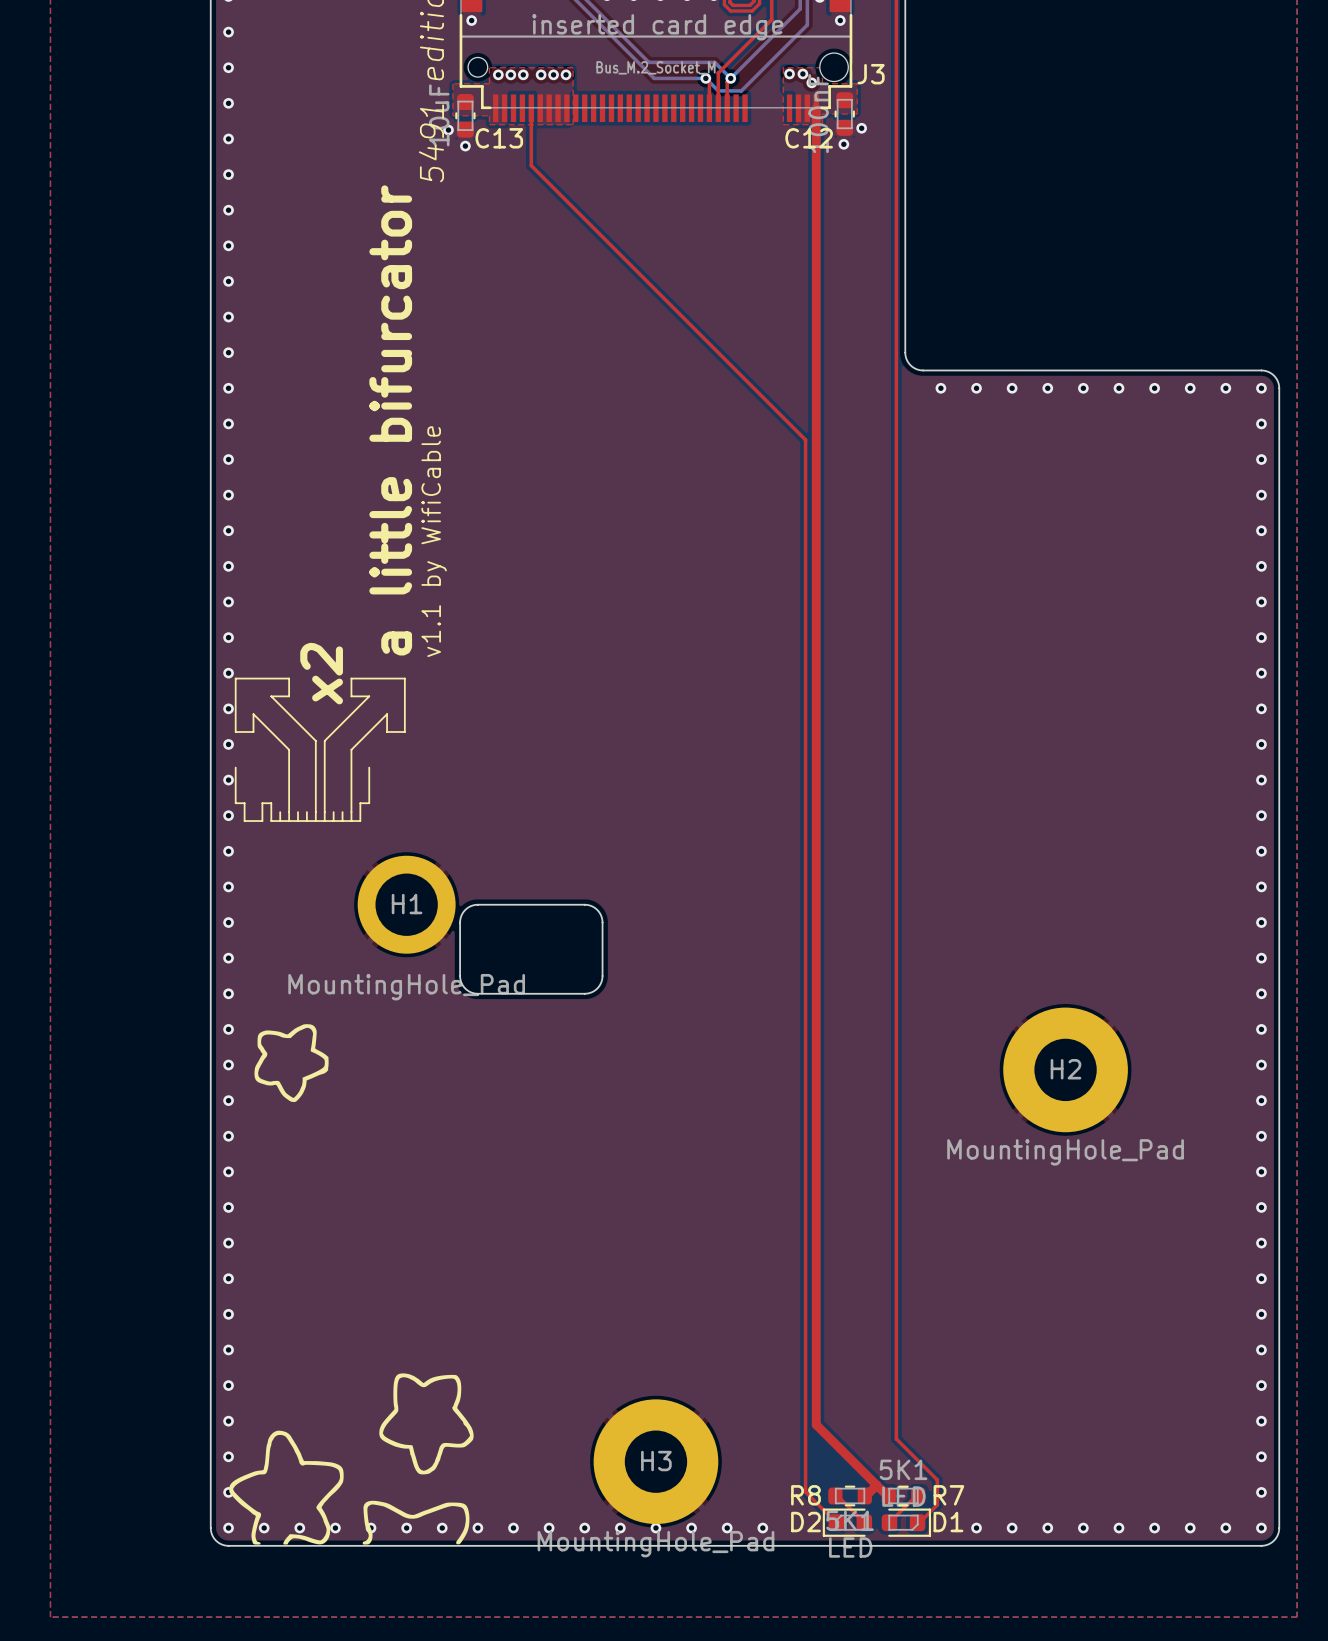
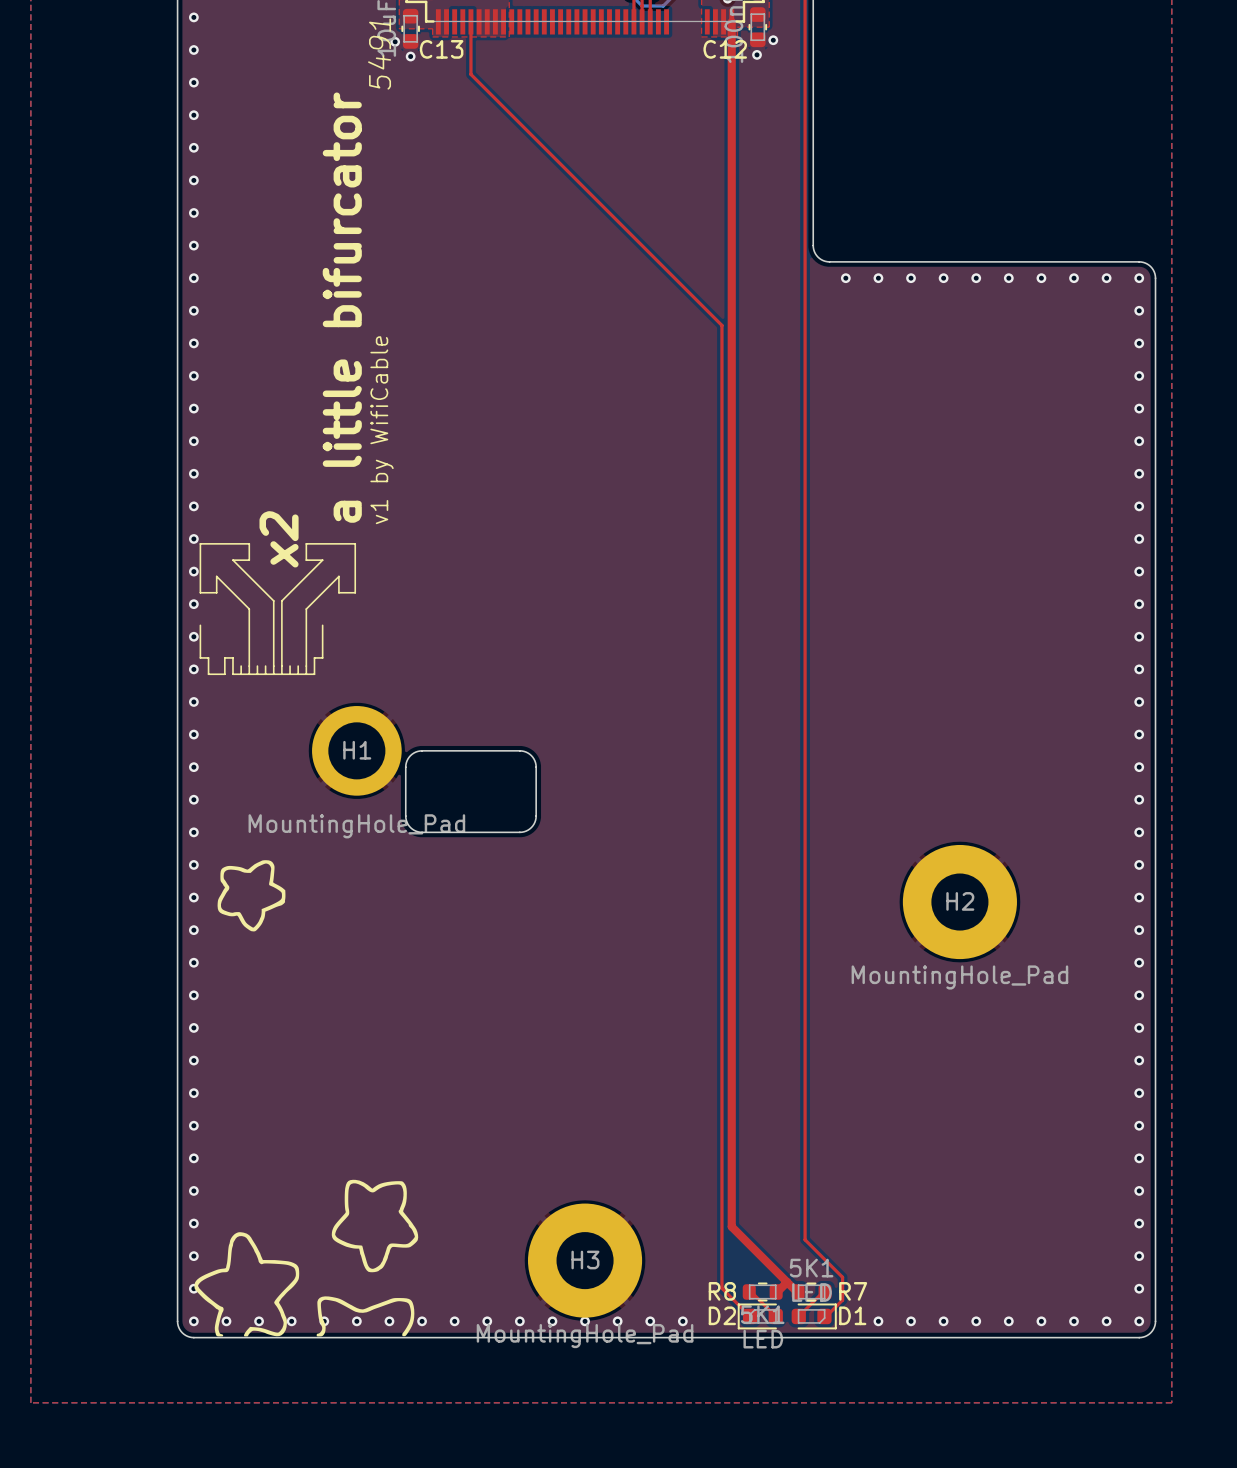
text: v1.1 by WifiCable (434, 541) -> v1 by WifiCable (382, 430)

